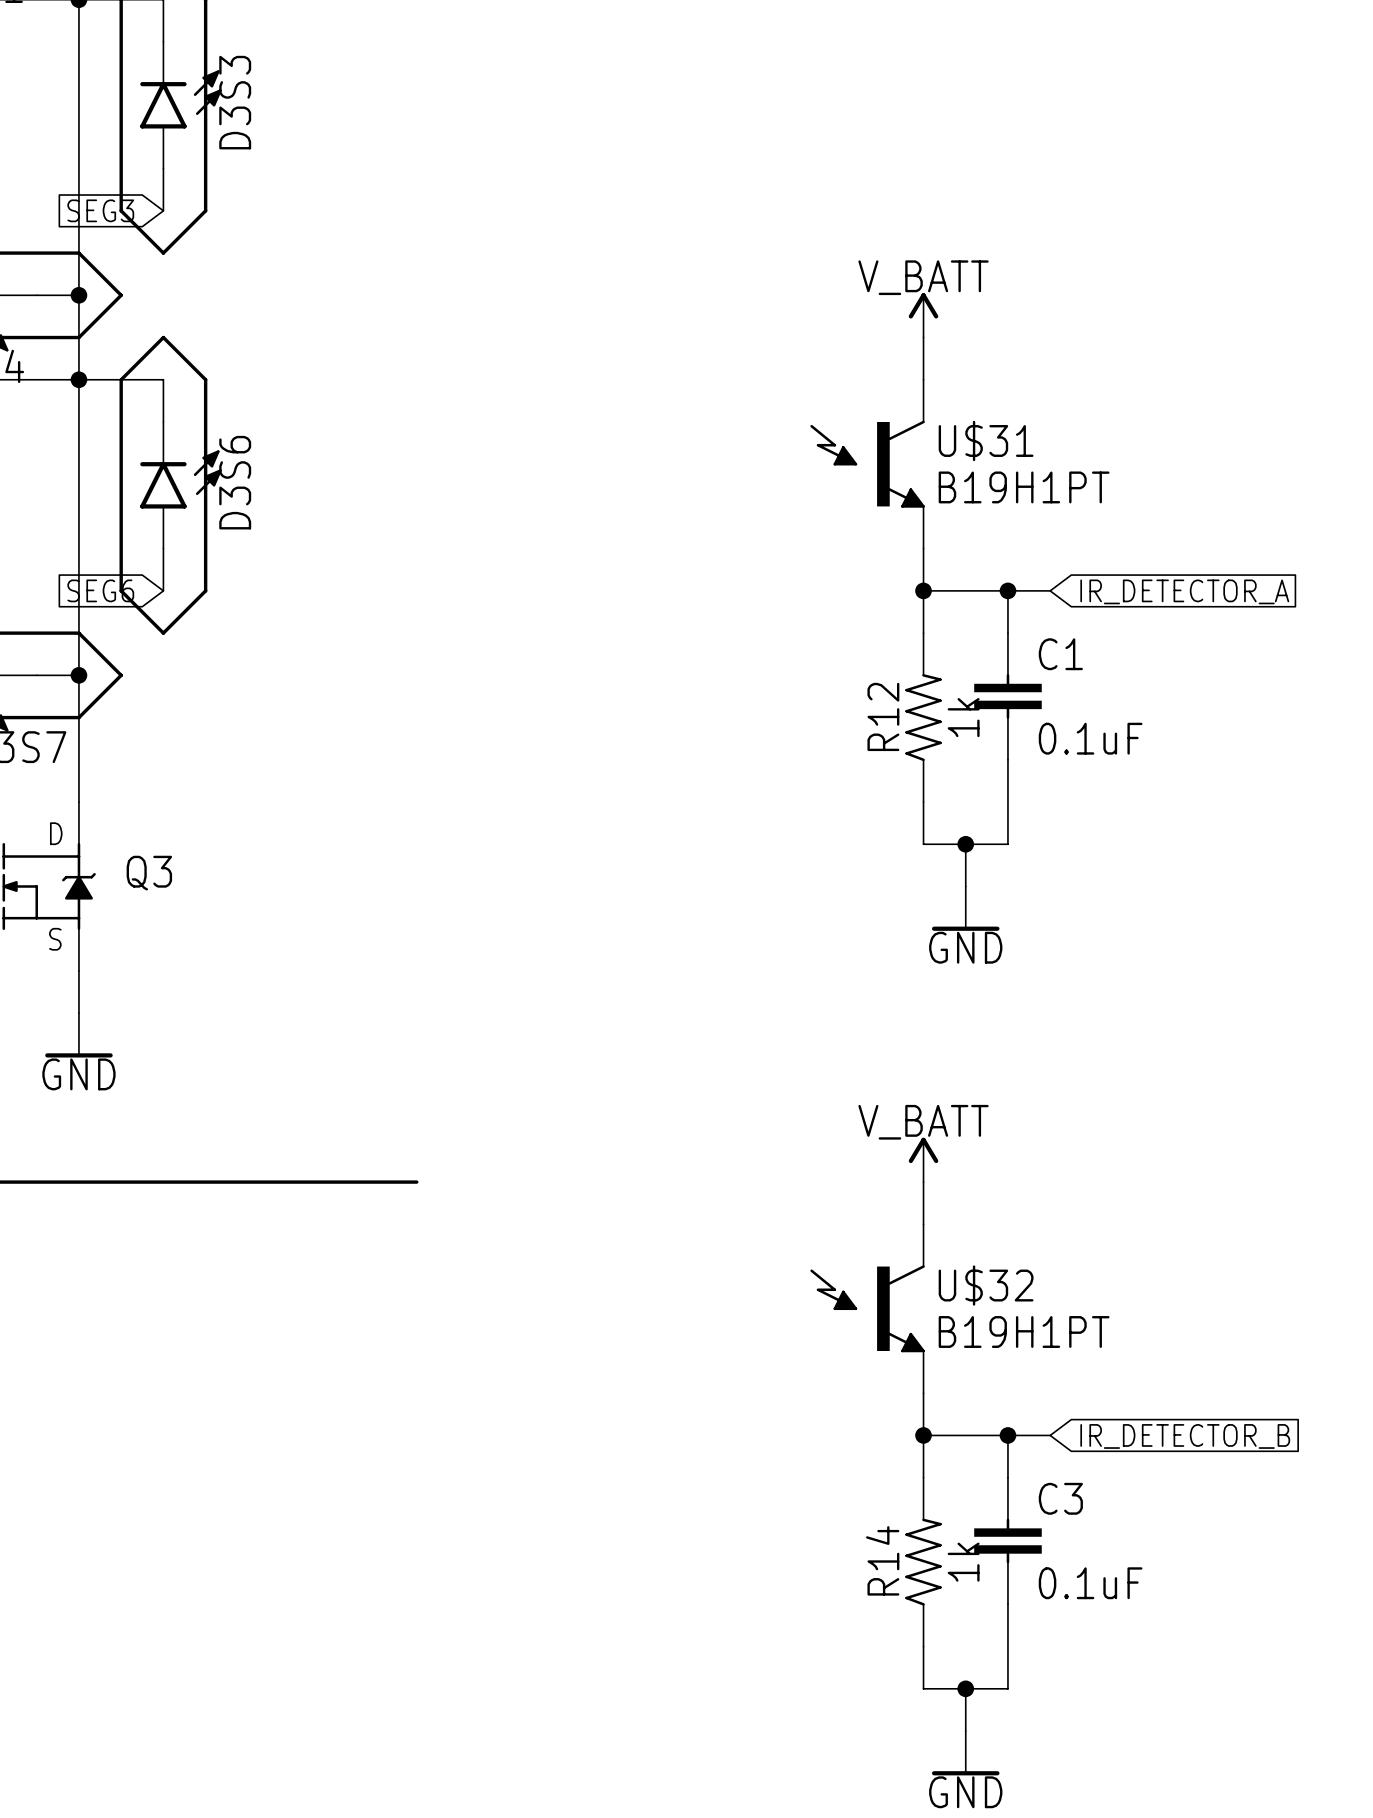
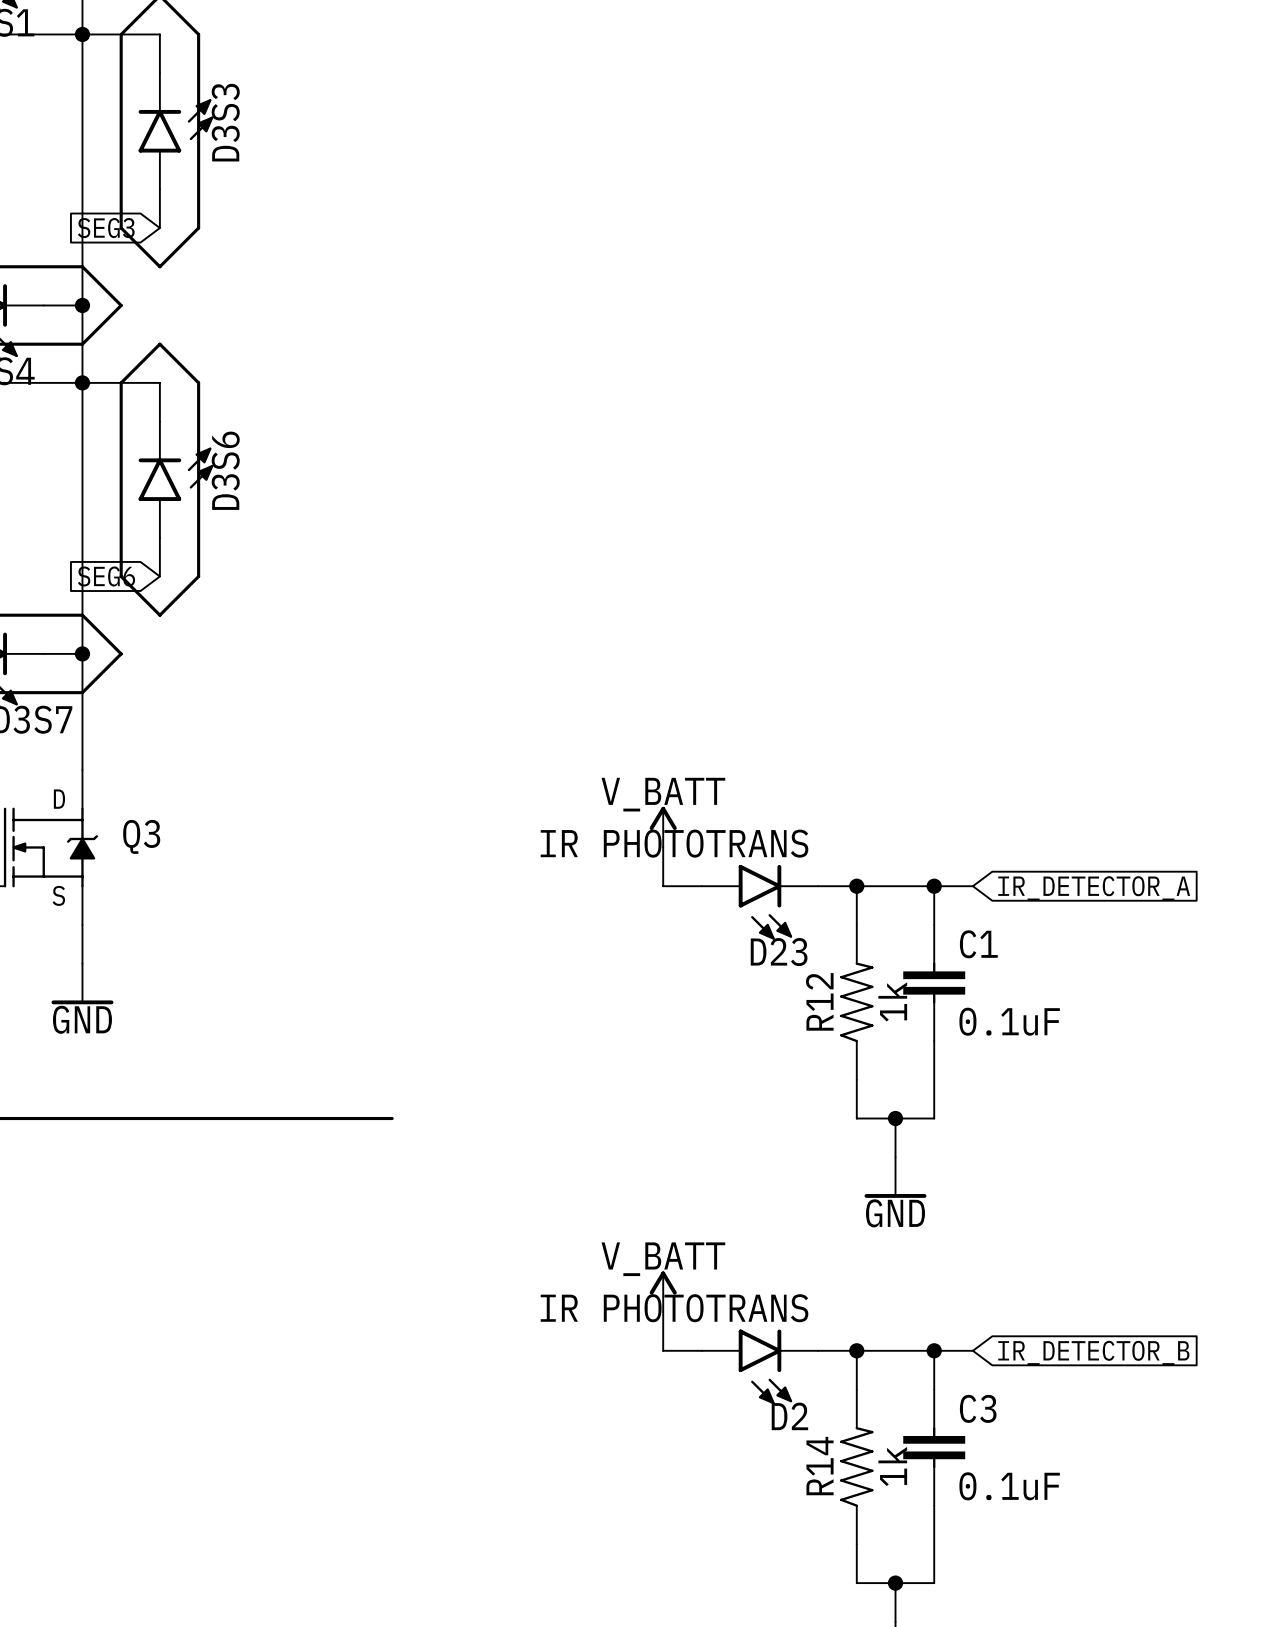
power symbol: V_BATT (923, 315) -> none
wire: (923, 337) (923, 379) -> none
U$31: B19H1PT (867, 464) -> none
wire: (923, 548) (923, 633) -> none
wire: (923, 590) (1050, 590) -> none
junction: (923, 590) -> none
wire: (1007, 590) (1007, 633) -> (934, 886) (934, 924)
junction: (1007, 590) -> none
global label position: IR_DETECTOR_A (1184, 591) -> IR_DETECTOR_A (1094, 888)
C1 position: (1007, 696) -> (934, 983)
R12 position: (923, 717) -> (856, 1002)
wire: (1007, 759) (1007, 844) (923, 844) (923, 802) -> (934, 1041) (934, 1118) (856, 1118) (856, 1079)
wire: (965, 844) (965, 886) -> (895, 1118) (895, 1157)
junction: (965, 844) -> none
power symbol: none -> V_BATT (663, 827)
wire: none -> (663, 847) (663, 886) (701, 886)
power symbol position: GND (965, 908) -> GND (895, 1177)
wire: none -> (818, 886) (972, 886)
junction: none -> (856, 886)
junction: none -> (934, 886)
D23: none -> IR PHOTOTRANS (760, 902)
power symbol: V_BATT (923, 1159) -> none
wire: (923, 1182) (923, 1224) -> (856, 886) (856, 924)
junction: none -> (895, 1118)
U$32: B19H1PT (867, 1308) -> none
power symbol: none -> V_BATT (663, 1291)
wire: none -> (663, 1312) (663, 1350) (701, 1350)
wire: (923, 1393) (923, 1435) -> (818, 1350) (856, 1350)
D2: none -> IR PHOTOTRANS (760, 1366)

